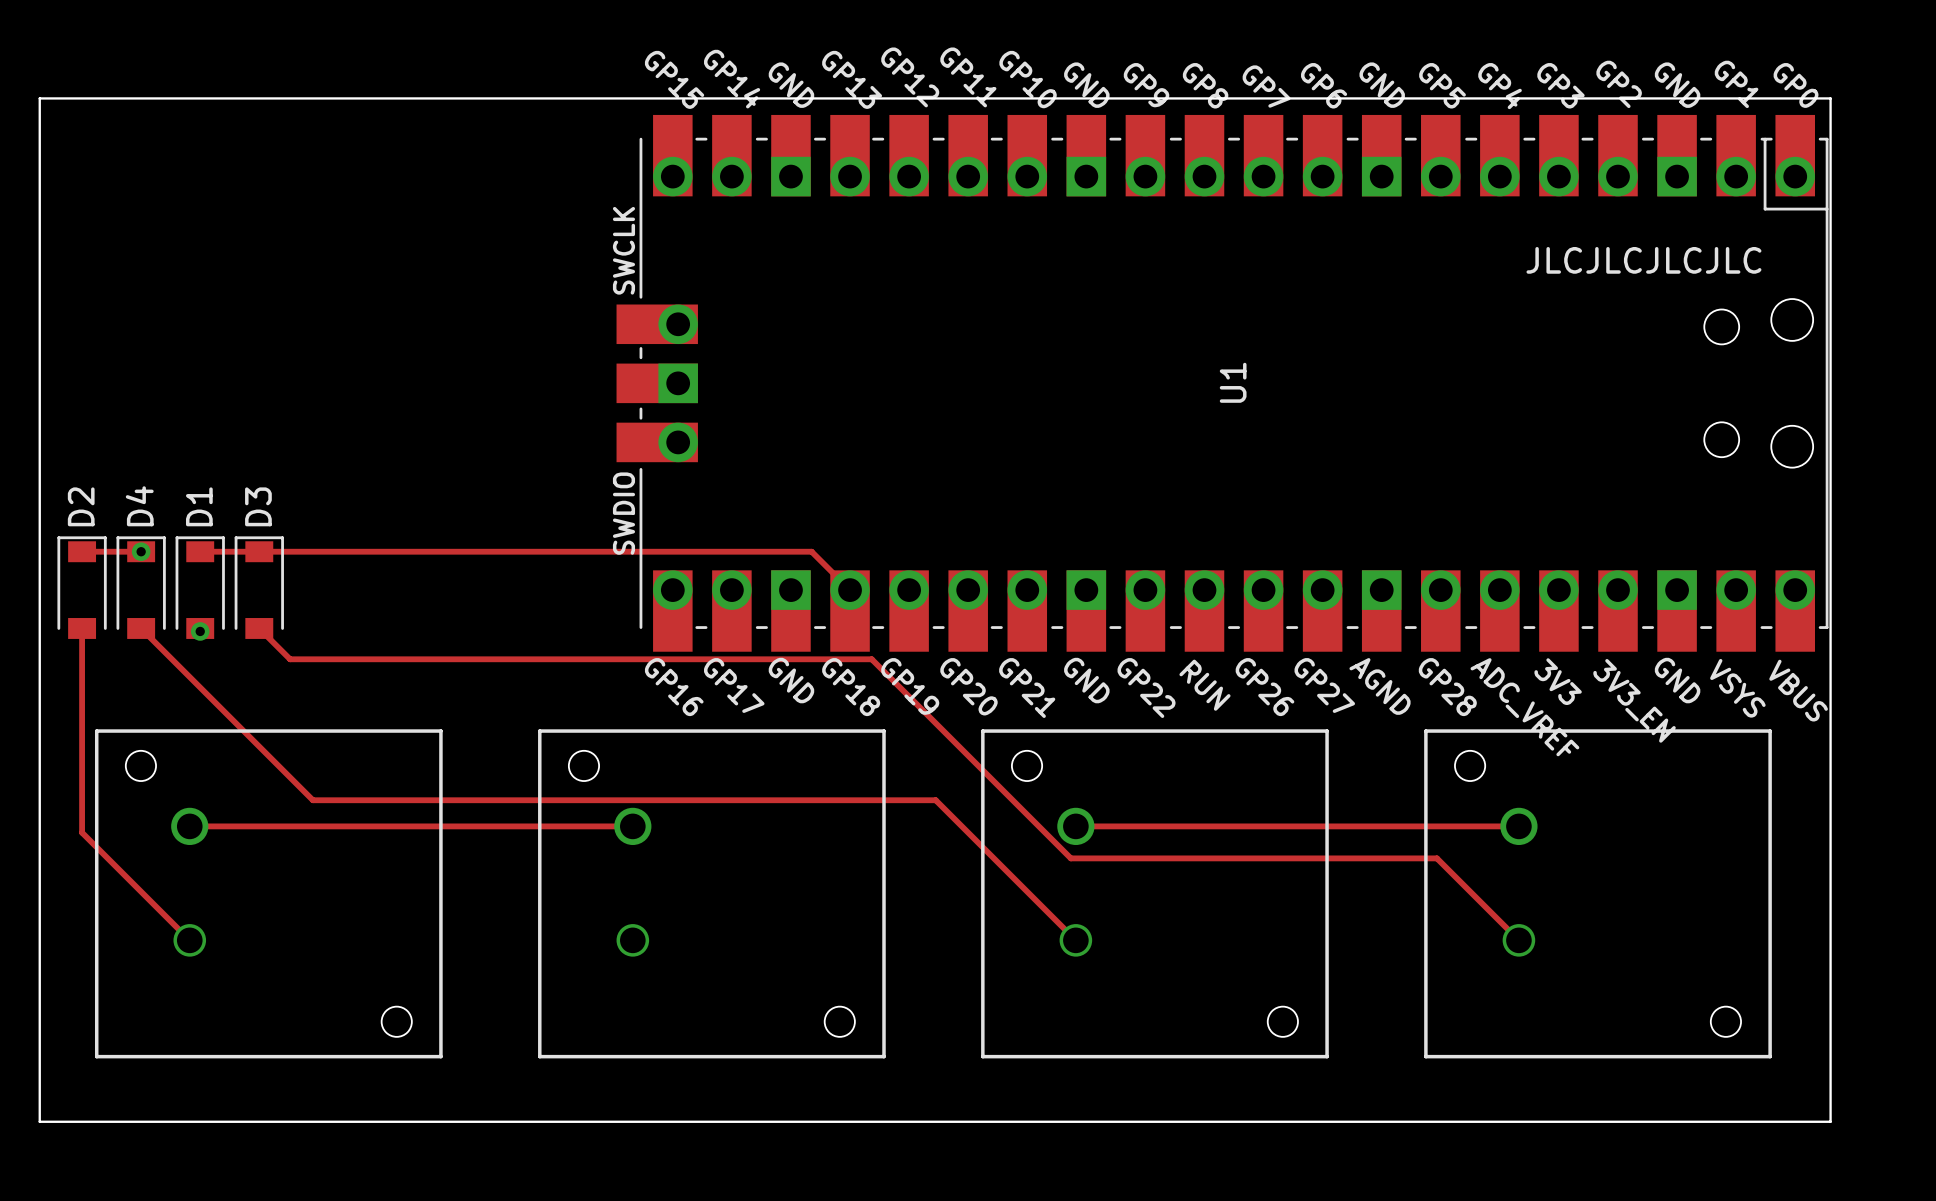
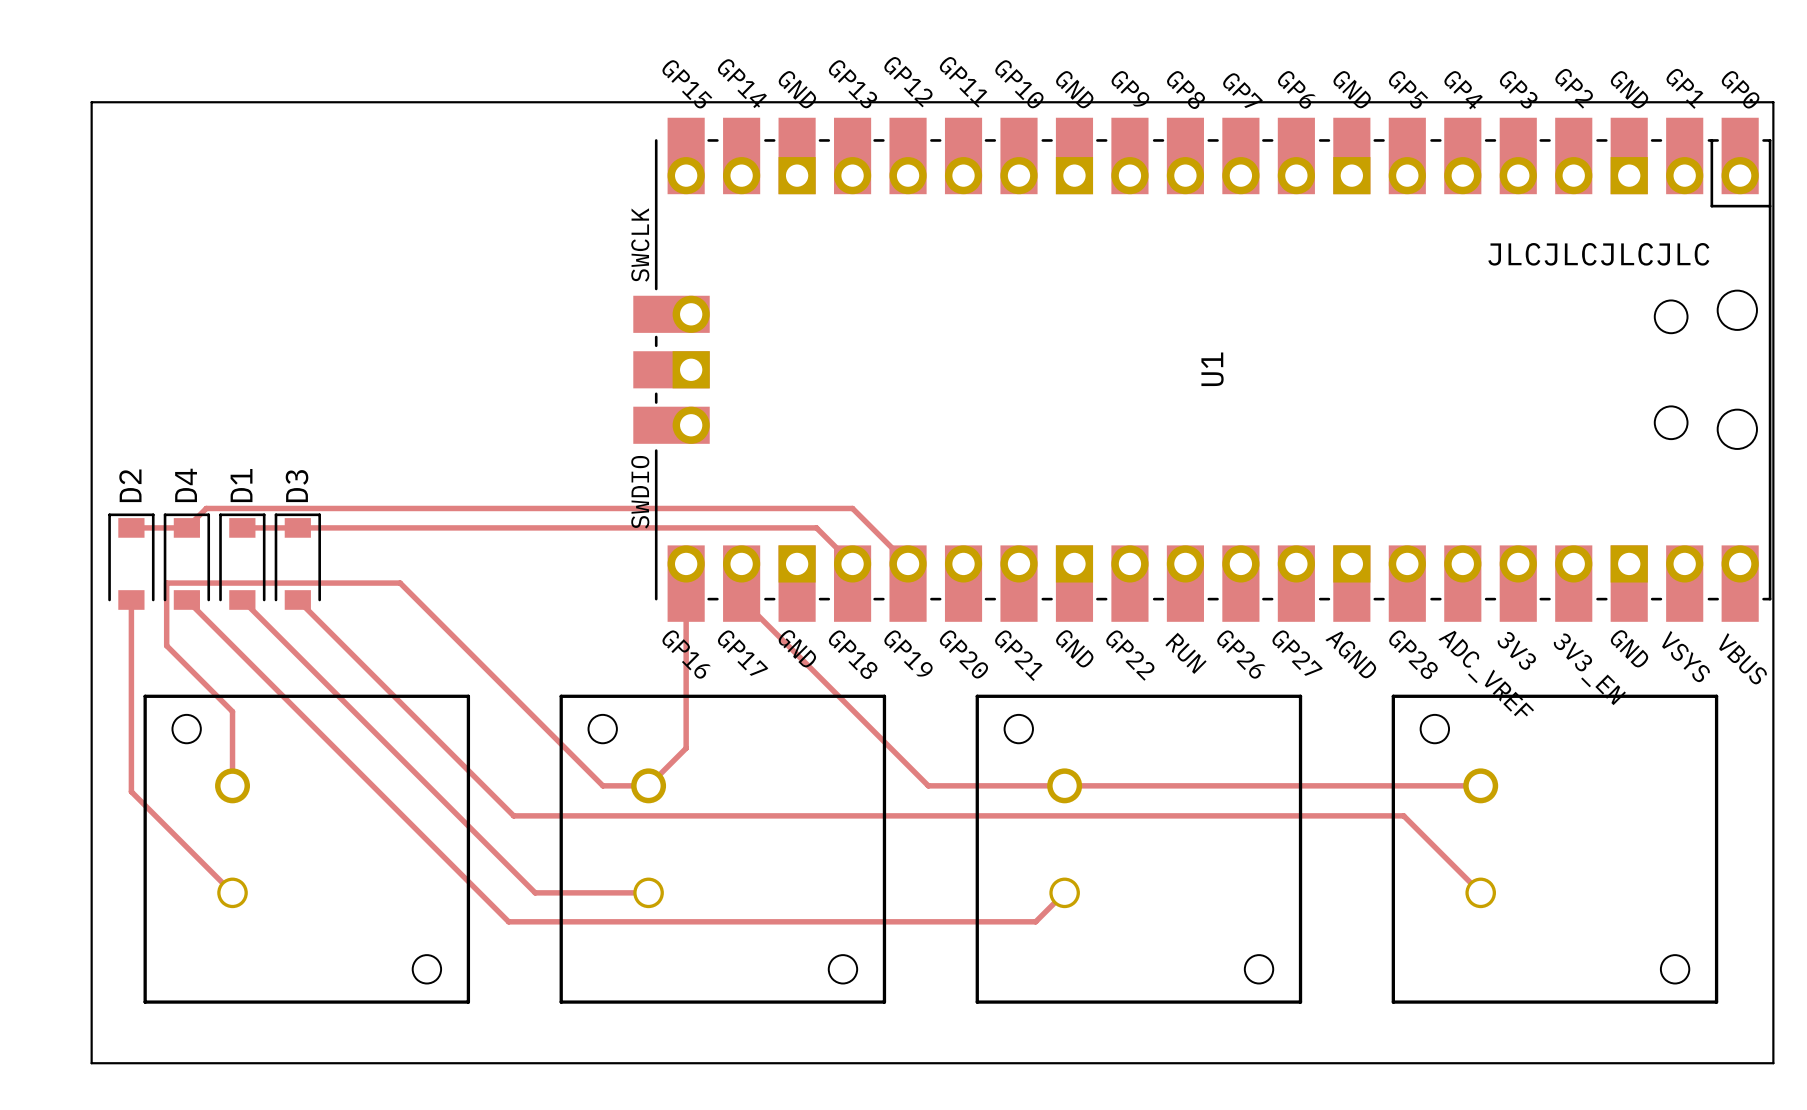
track: none -> (186, 527) (206, 508) (852, 508) (908, 563)
via: (141, 551) -> none
track: none -> (686, 563) (686, 748) (648, 785)
track: none -> (741, 563) (741, 599) (928, 785) (1064, 785)
track: none -> (242, 599) (535, 892) (648, 892)
via: (200, 631) -> none
track: (290, 659) (871, 659) (1070, 858) (1436, 858) -> (326, 628) (513, 815) (1403, 815)
track: (312, 800) (935, 800) (1075, 940) -> (348, 761) (508, 921) (1035, 921) (1064, 892)
track: (189, 826) (584, 826) -> (232, 785) (232, 711) (166, 645) (166, 583) (400, 583) (602, 785)

